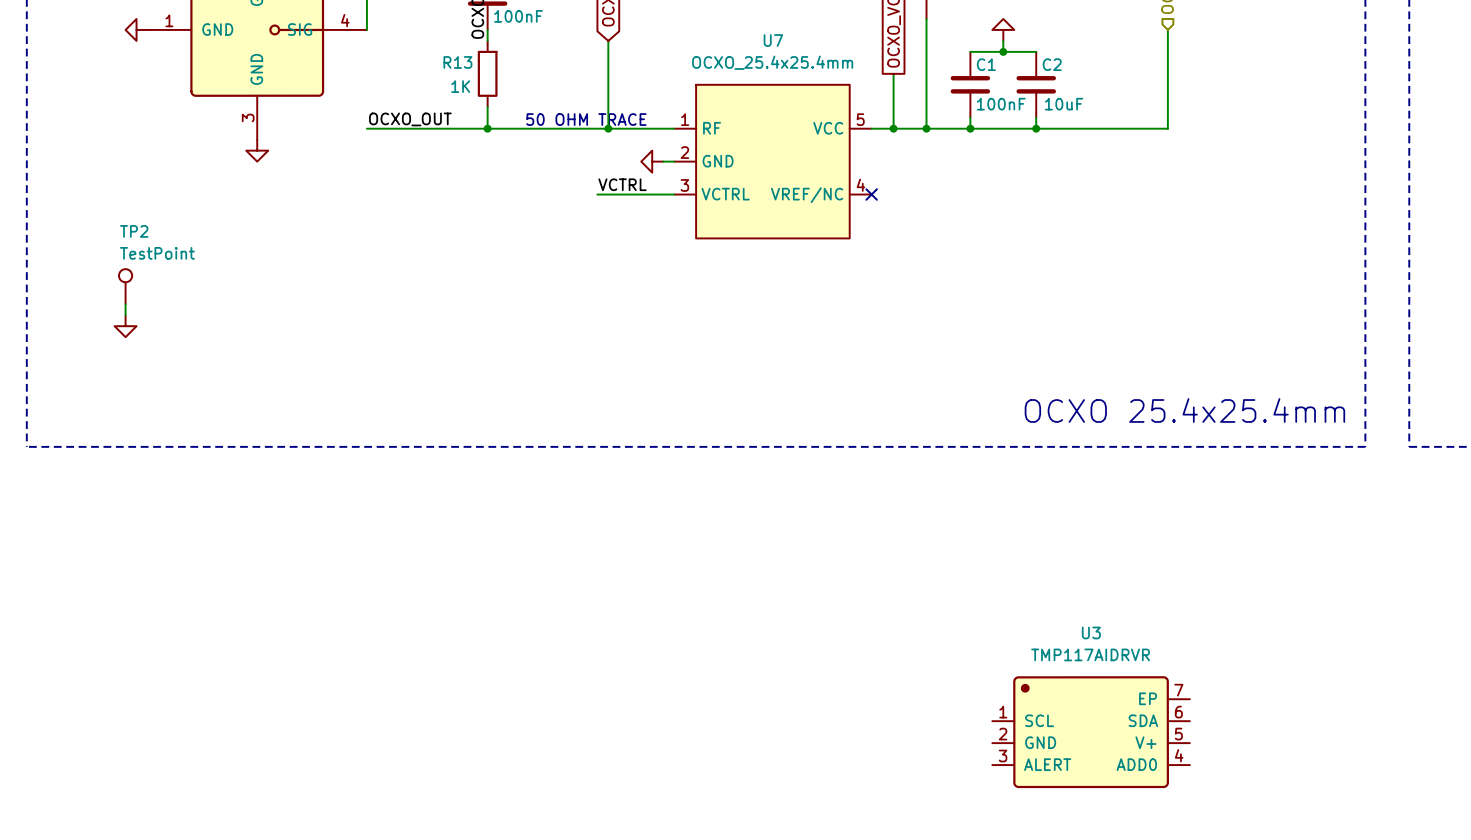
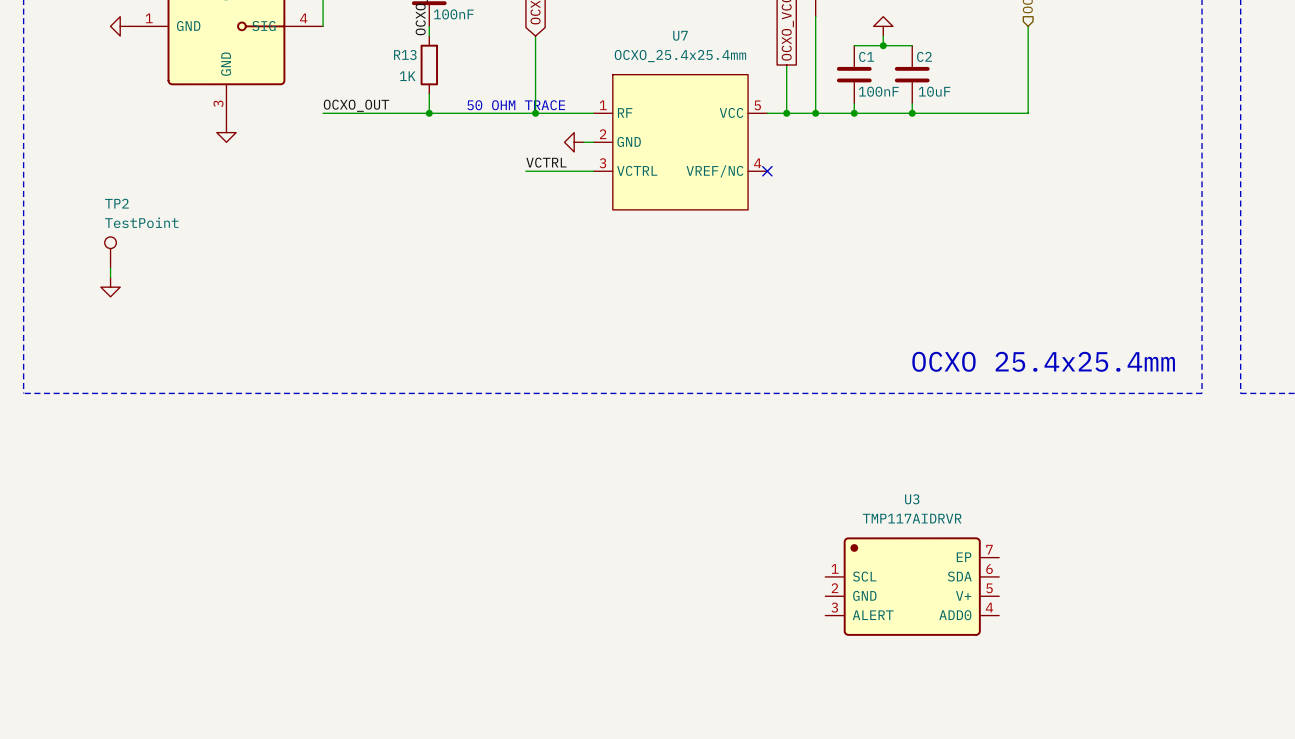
U3 position: (1091, 732) -> (912, 586)

